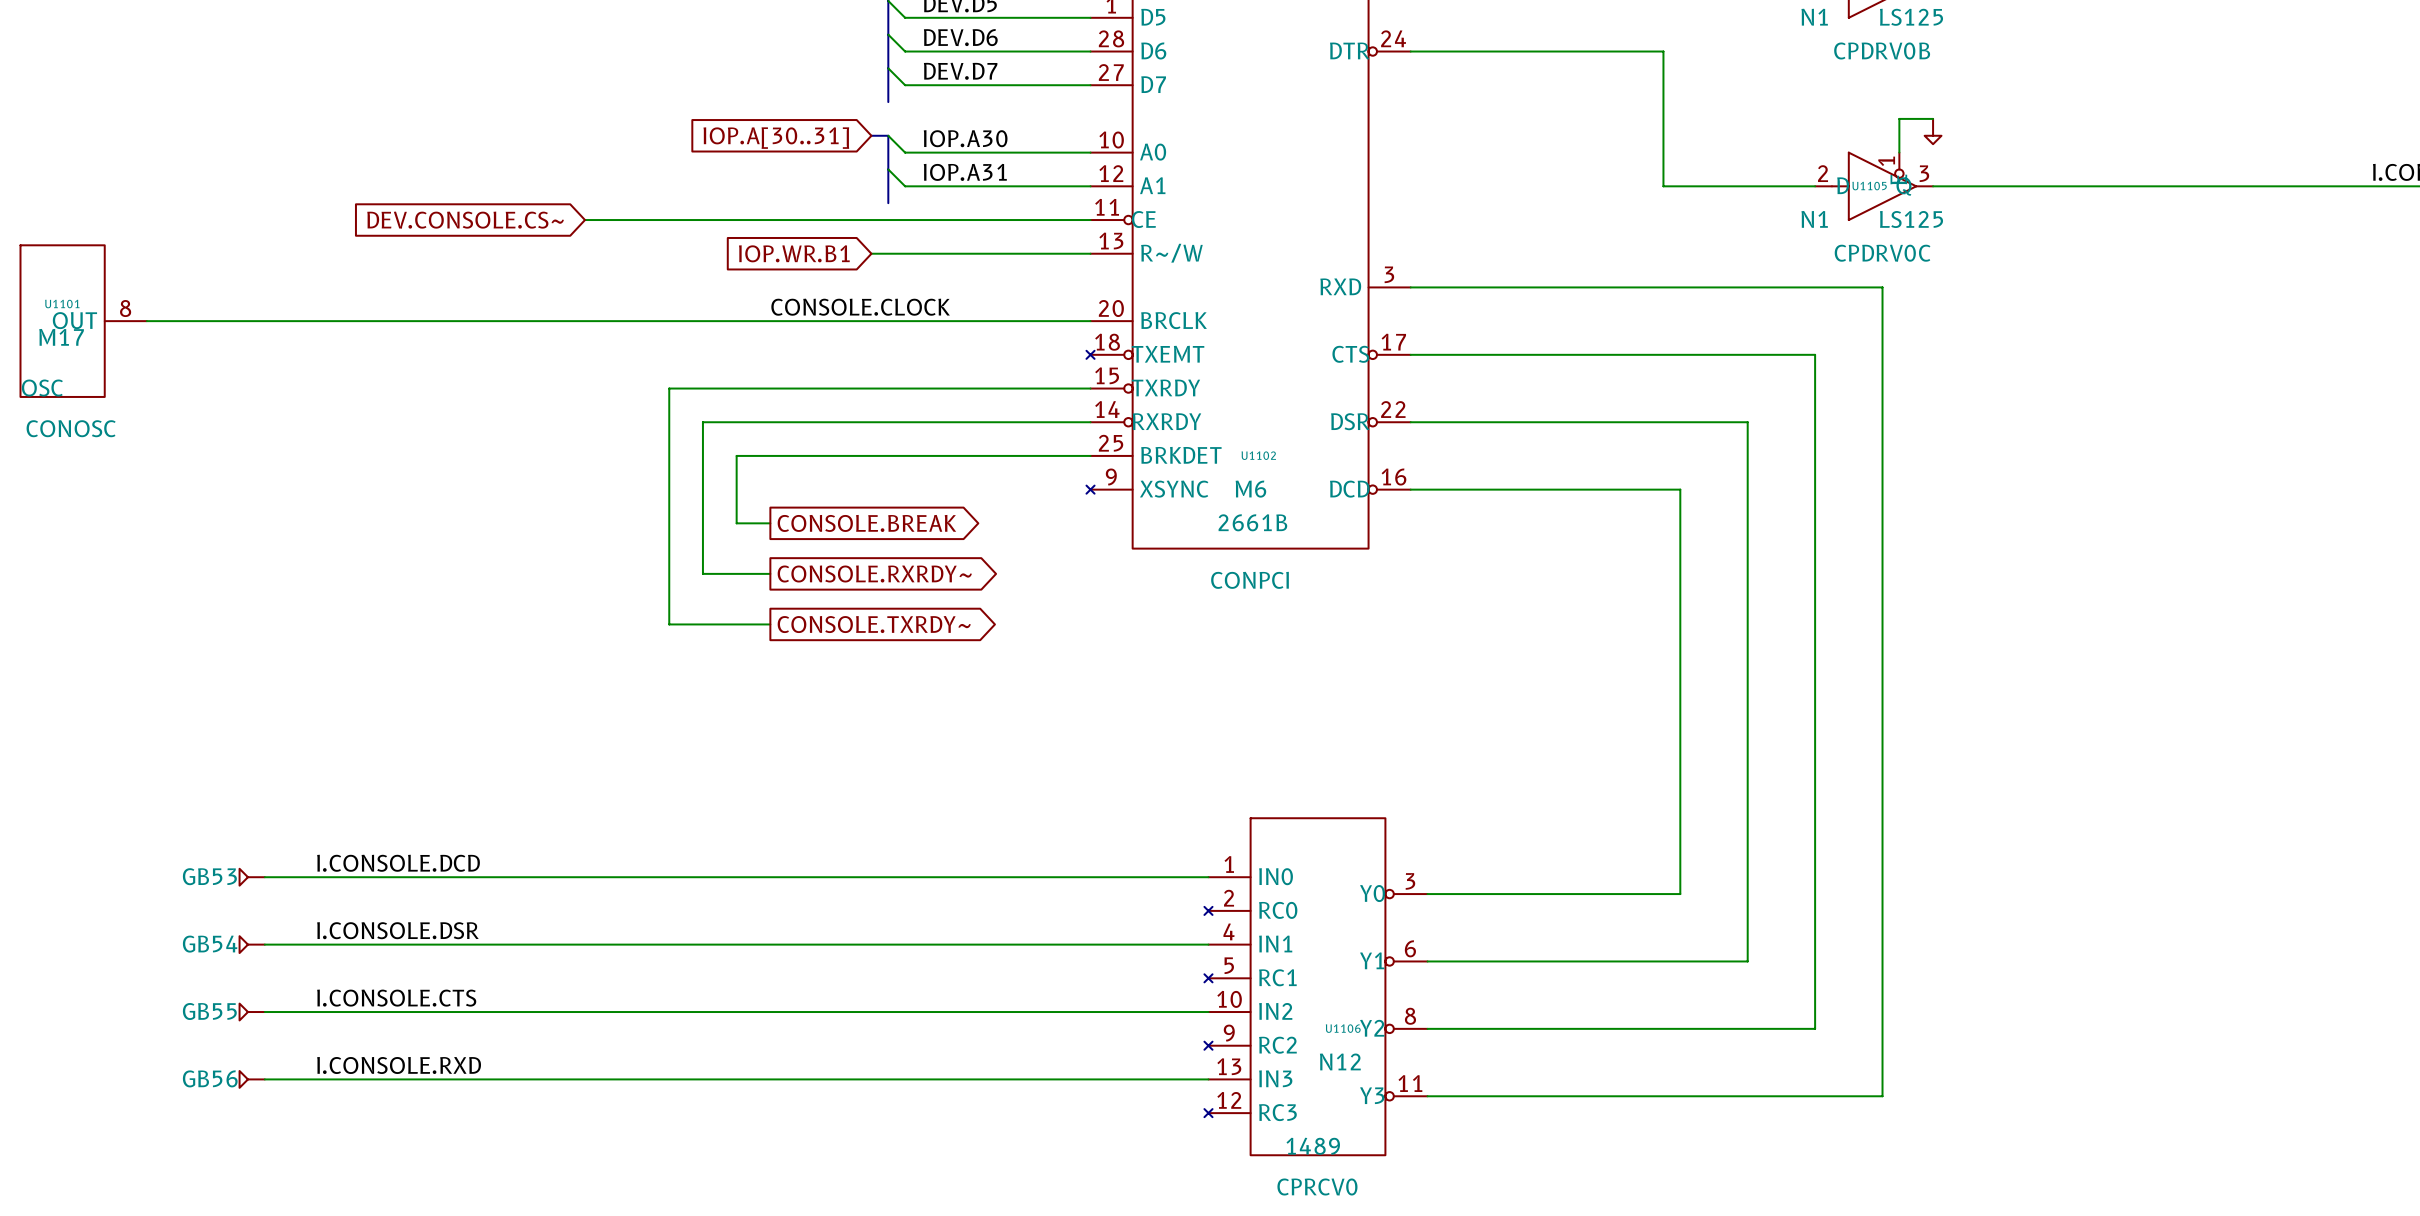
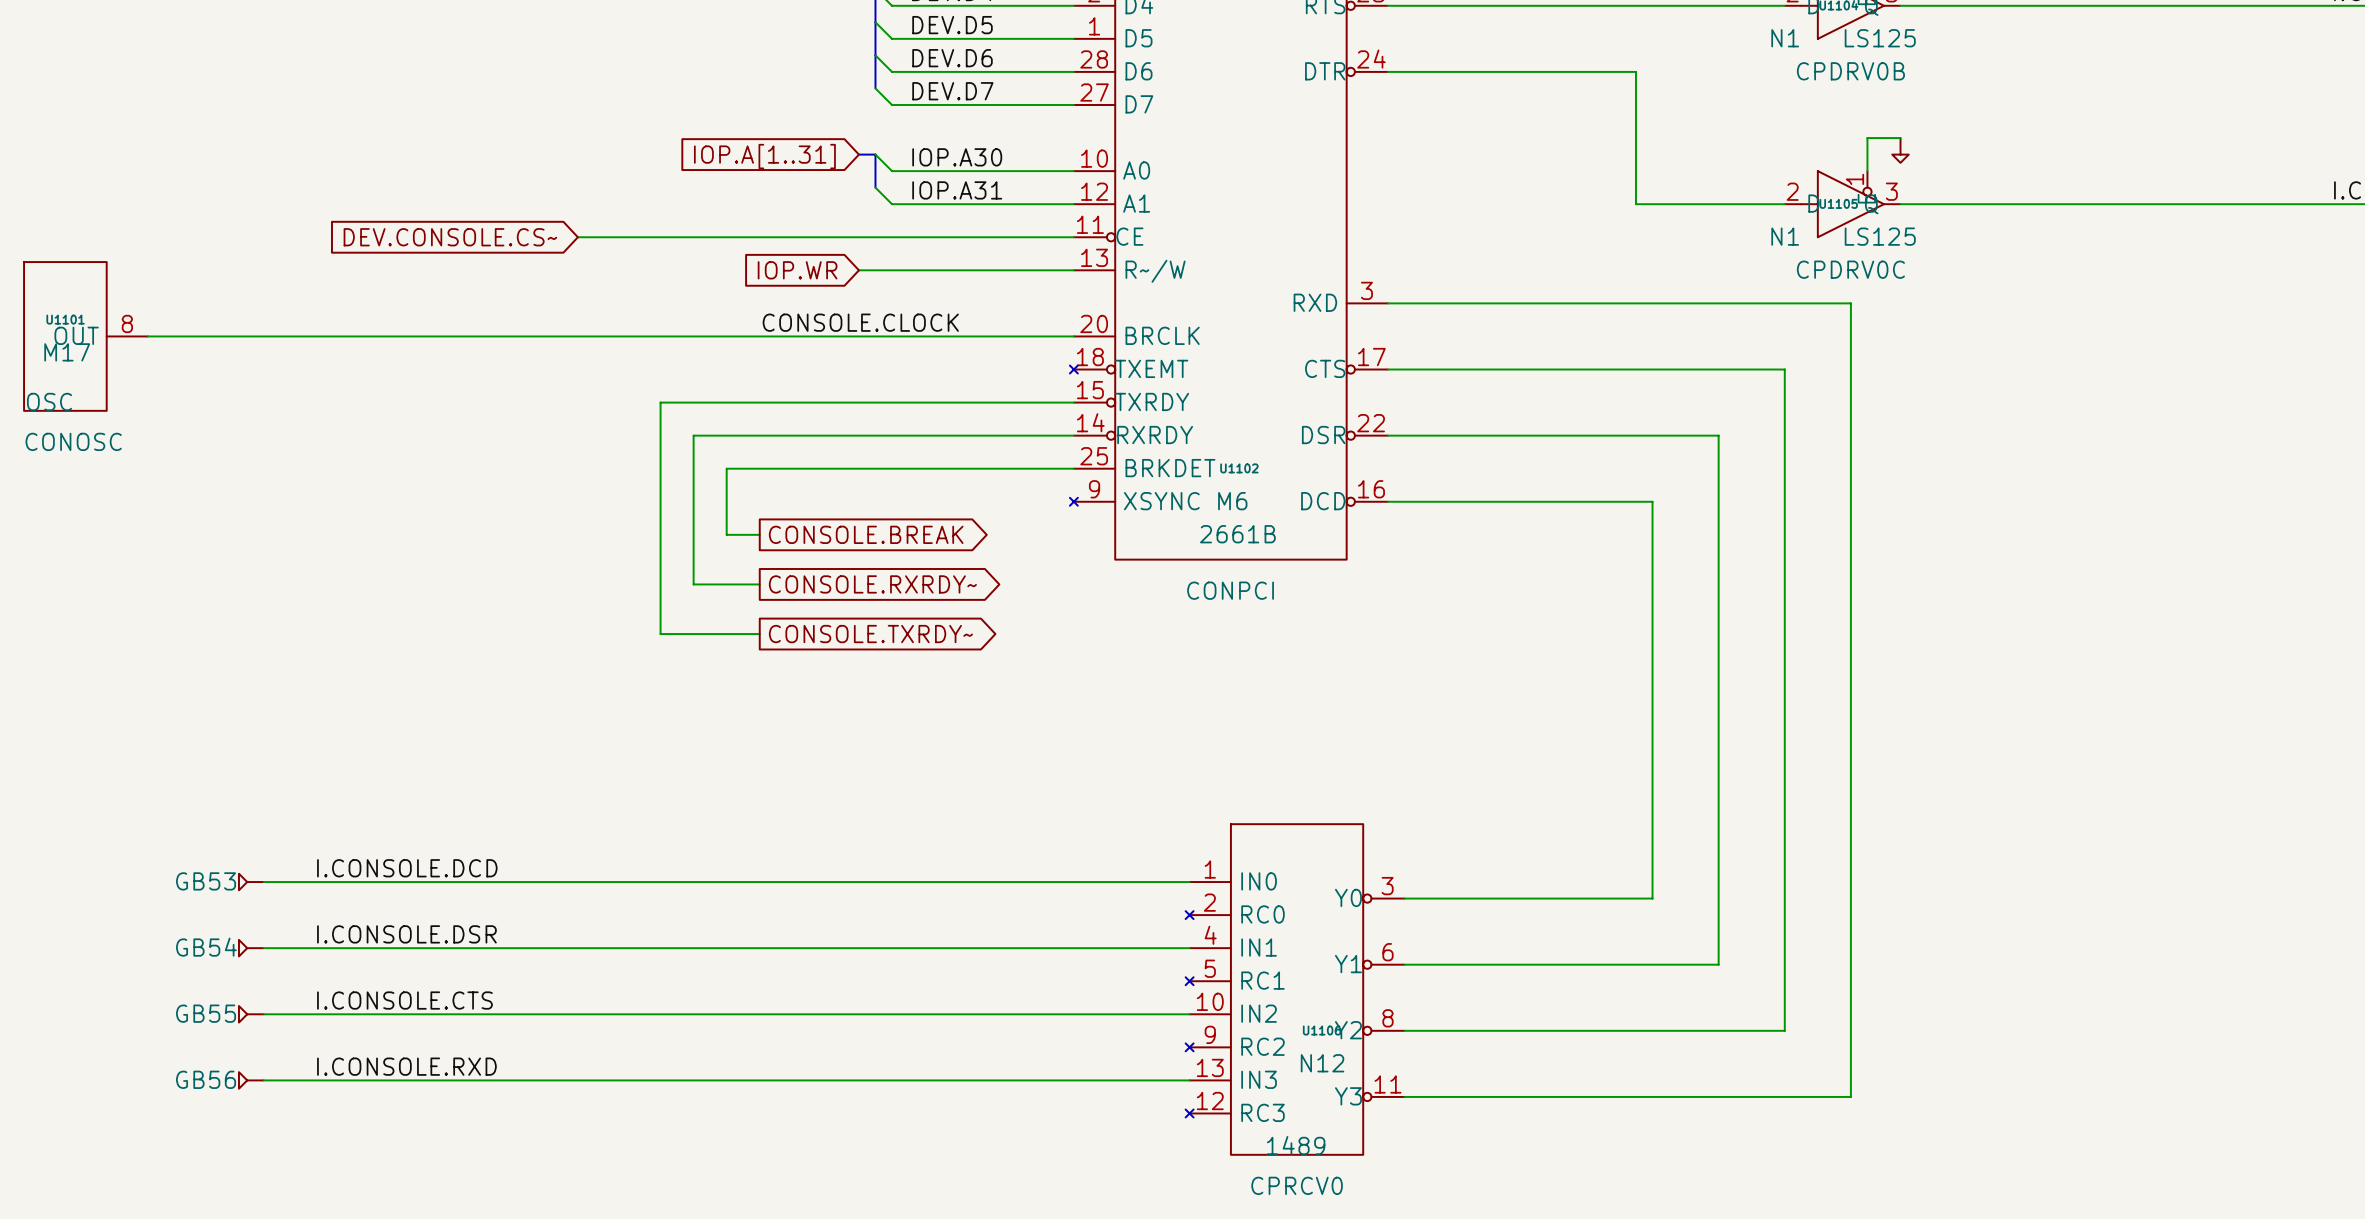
bus: (888, 68) (888, 102) -> none
global label: IOP.A[30..31] (776, 138) -> IOP.A[1..31] (764, 156)
bus: (888, 169) (888, 203) -> none
global label: IOP.WR.B1 (794, 253) -> IOP.WR (797, 270)

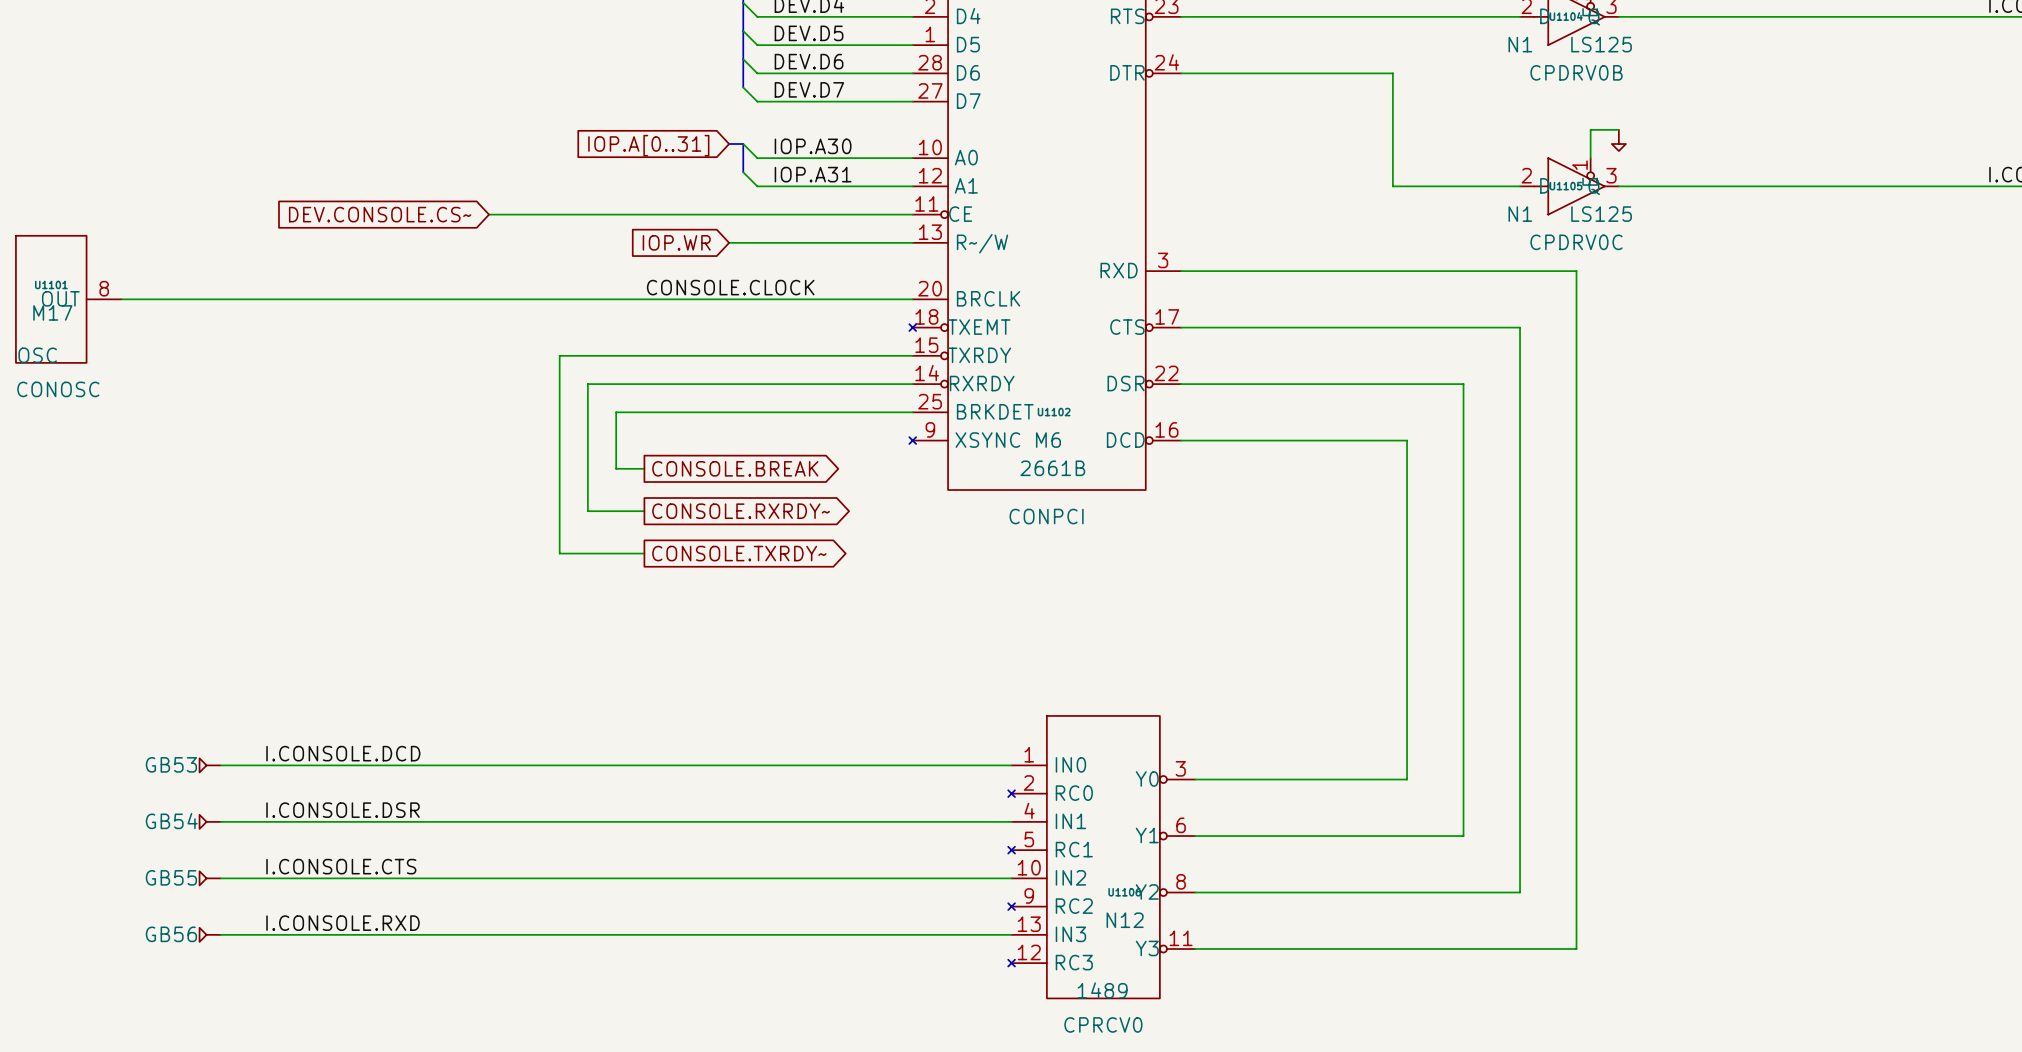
global label: IOP.A[1..31] (764, 156) -> IOP.A[0..31] (648, 145)

